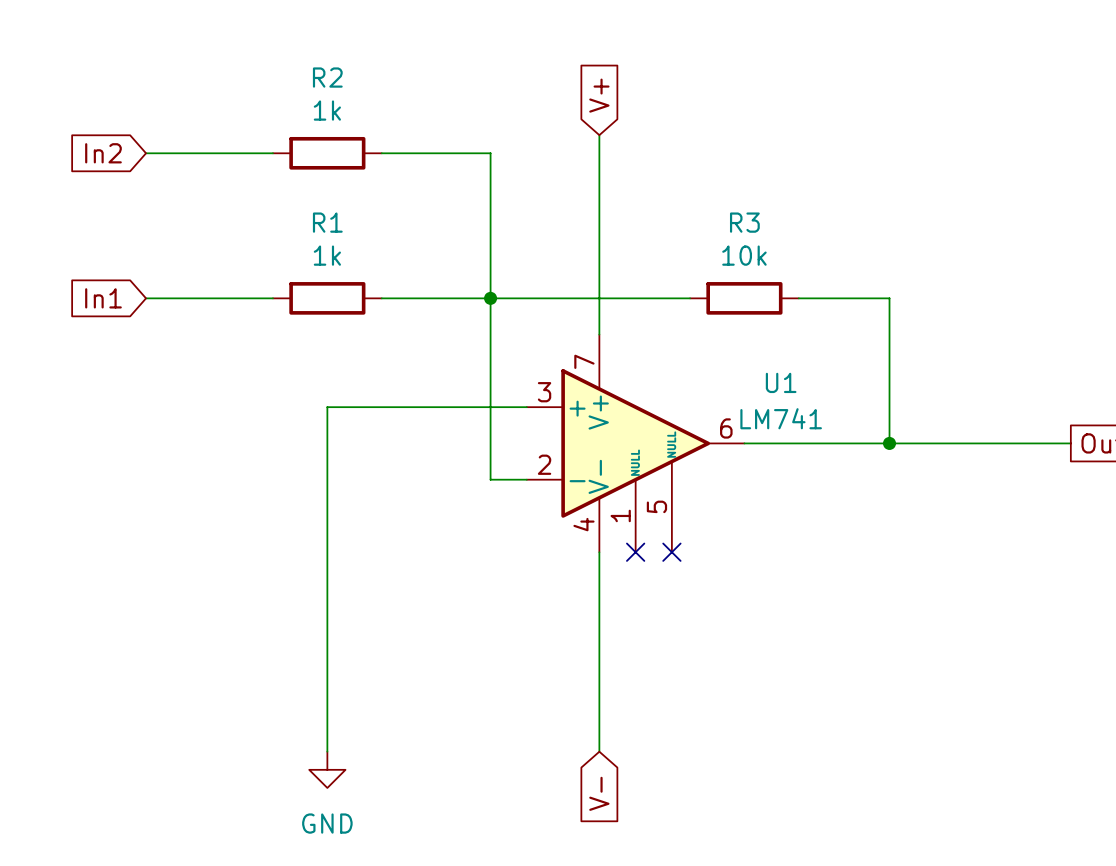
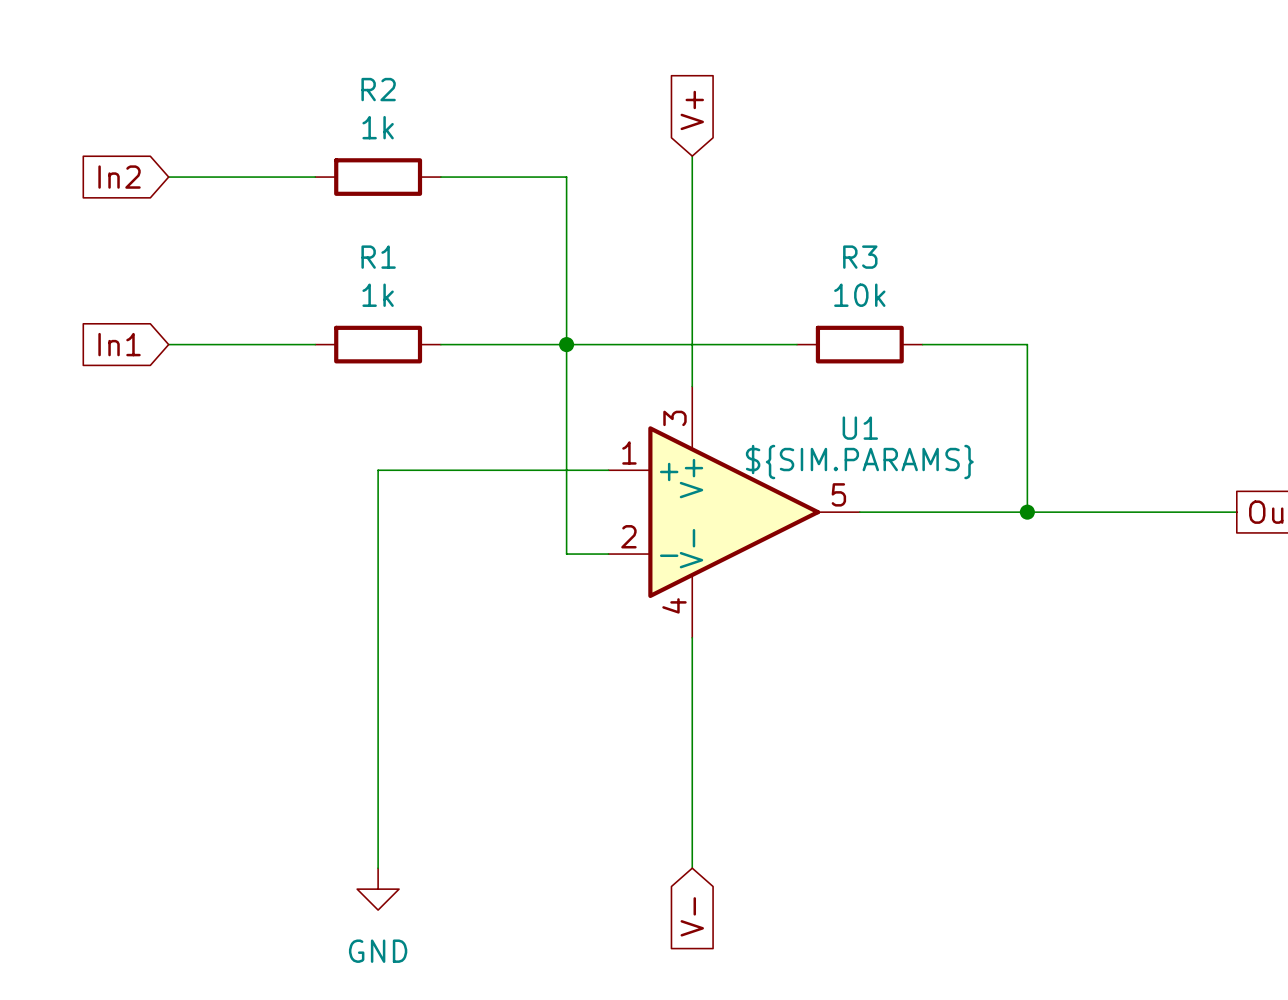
U1 symbol: [526, 334, 745, 553] -> [608, 386, 860, 638]
U1 name position: U1 (781, 382) -> U1 (860, 428)
U1 value: LM741 (781, 418) -> ${SIM.PARAMS} (859, 462)
no-connect mark: (635, 552) -> none
no-connect mark: (671, 552) -> none

